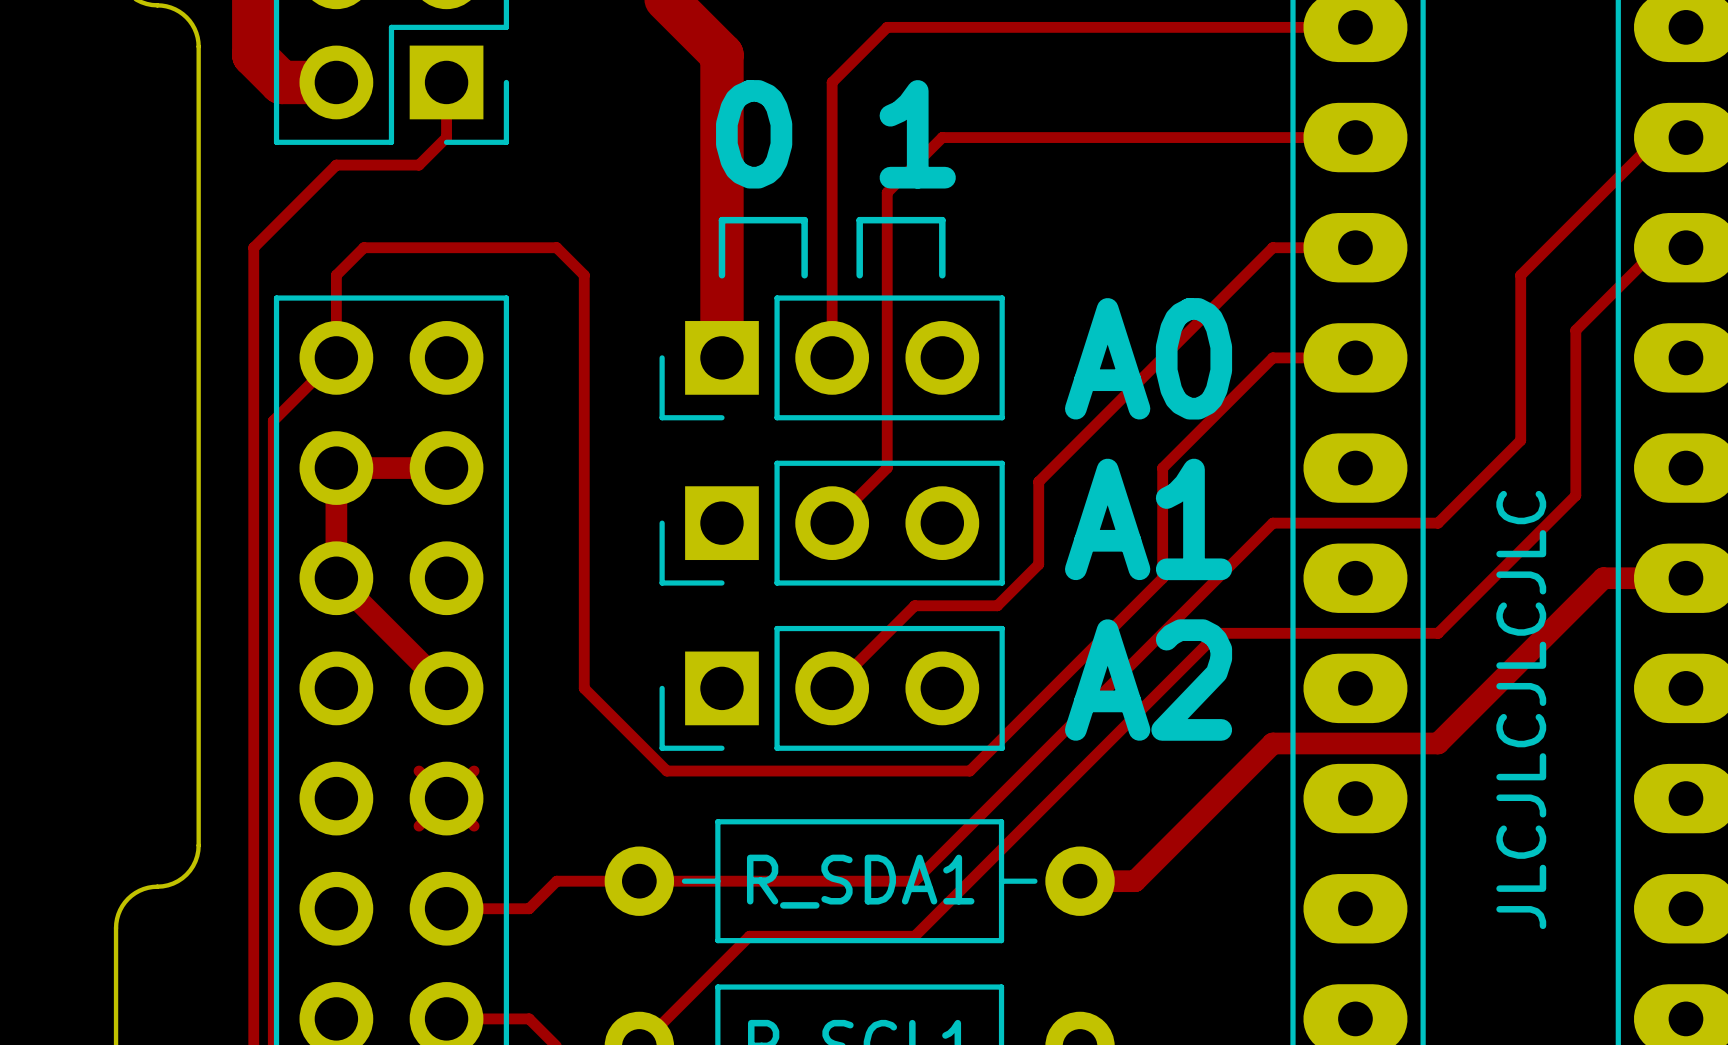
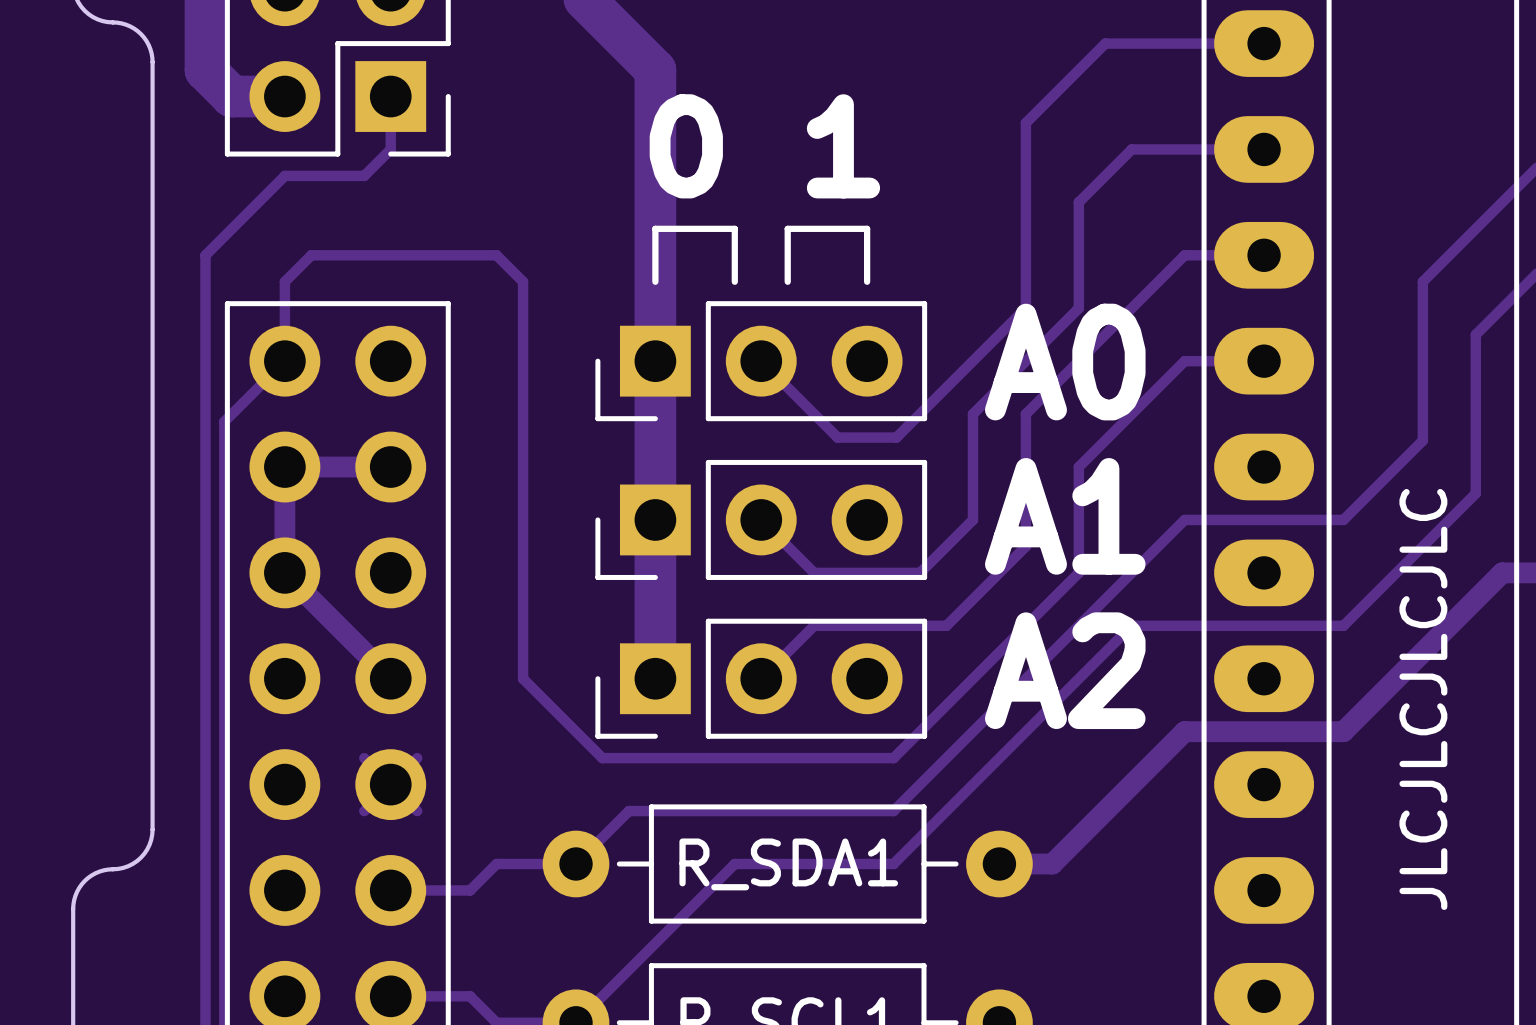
track: (1190, 27) (887, 27) (832, 82) (832, 357) -> (1105, 43) (1025, 122) (1025, 308) (896, 437) (837, 437) (761, 361)
track: (1217, 137) (942, 137) (887, 192) (887, 468) (832, 523) -> (1131, 149) (1078, 202) (1078, 308) (972, 414) (972, 519) (920, 572) (814, 572) (761, 519)
track: none -> (655, 361) (655, 678)
track: (1107, 412) (1038, 481) (1038, 564) (997, 605) (914, 605) (887, 633) -> (1025, 414) (1025, 546) (946, 625) (814, 625)
track: (969, 826) (914, 881) -> (893, 863) (840, 863)
track: none -> (893, 811) (628, 811) (576, 863)
track: (639, 881) (804, 881) -> (681, 916) (734, 863)
track: (969, 881) (914, 936) (749, 936) -> none

